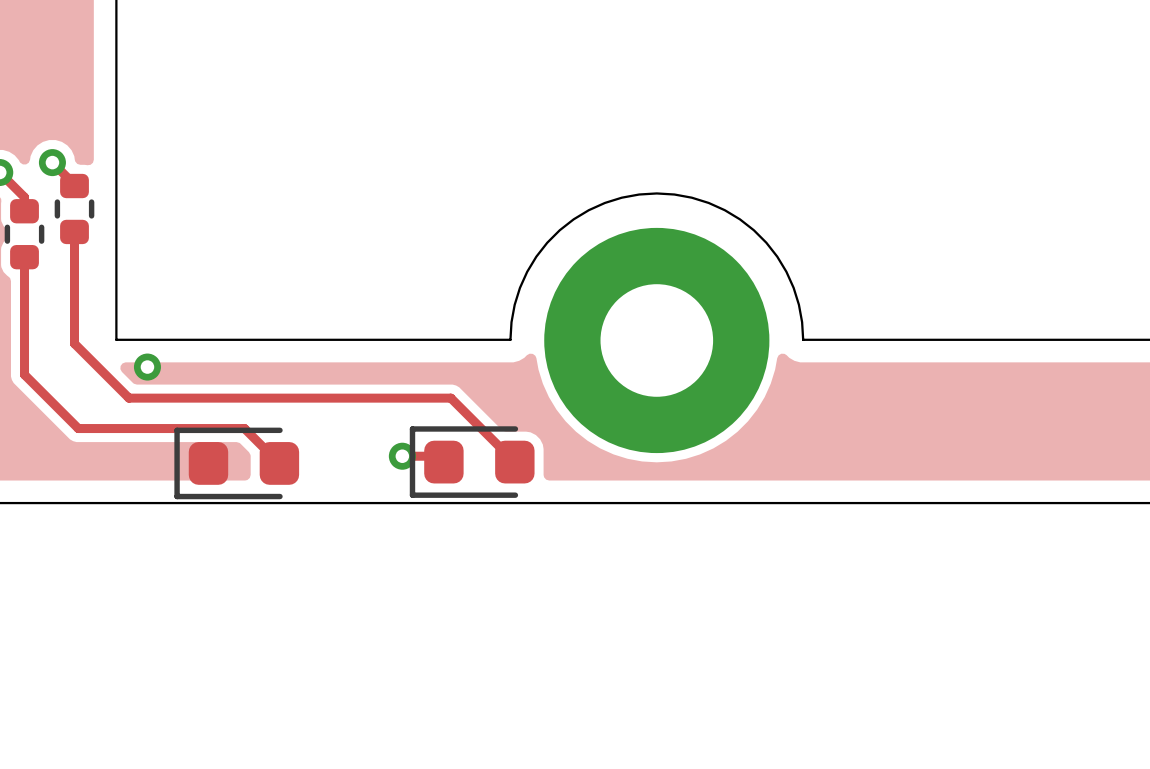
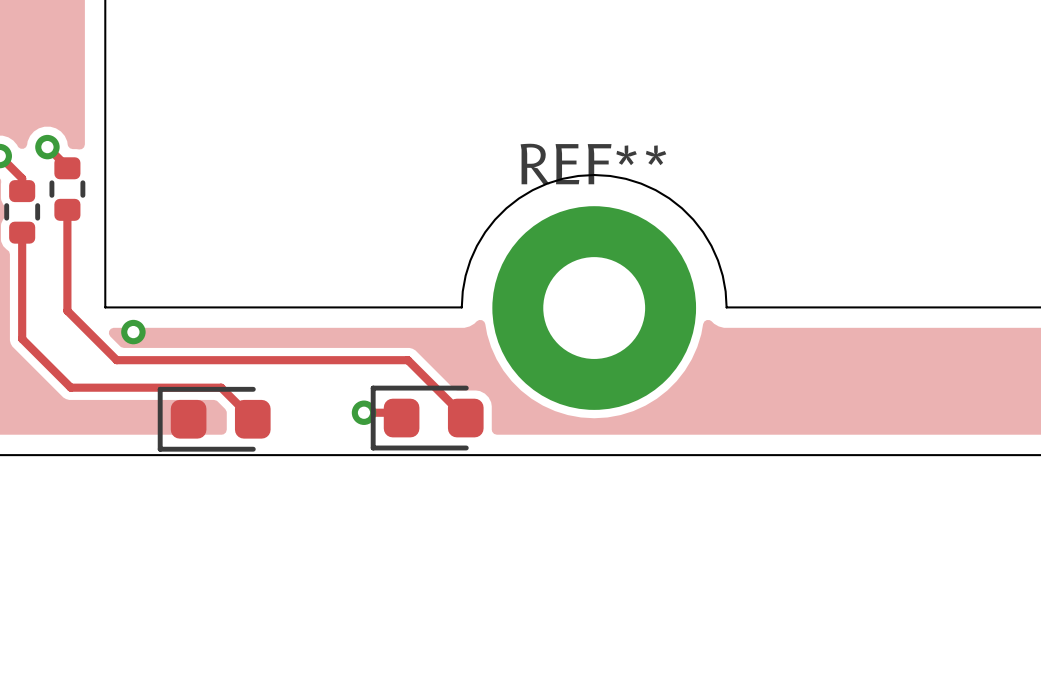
REF** name: none -> REF** (593, 164)

